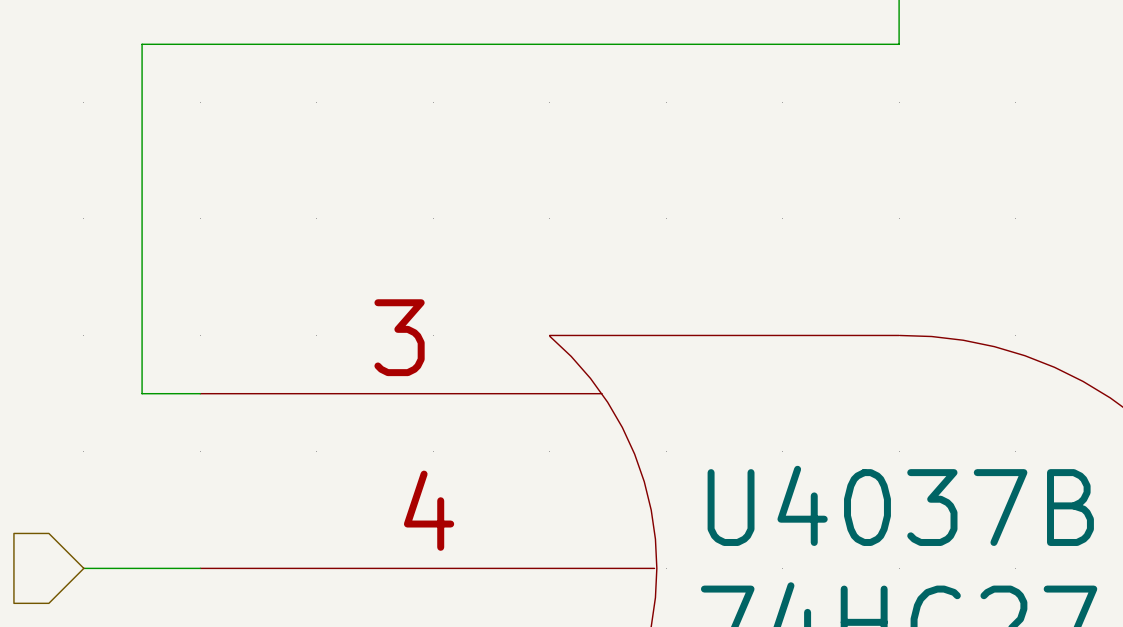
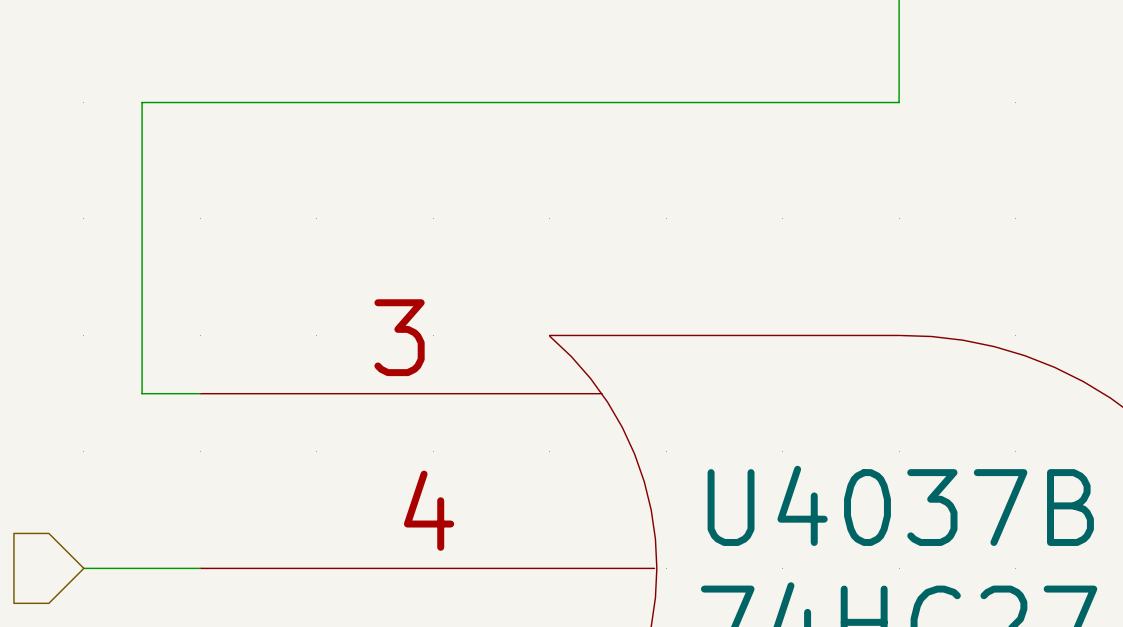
wire: (899, 44) (142, 44) (142, 102) -> (899, 44) (899, 102) (142, 102)

